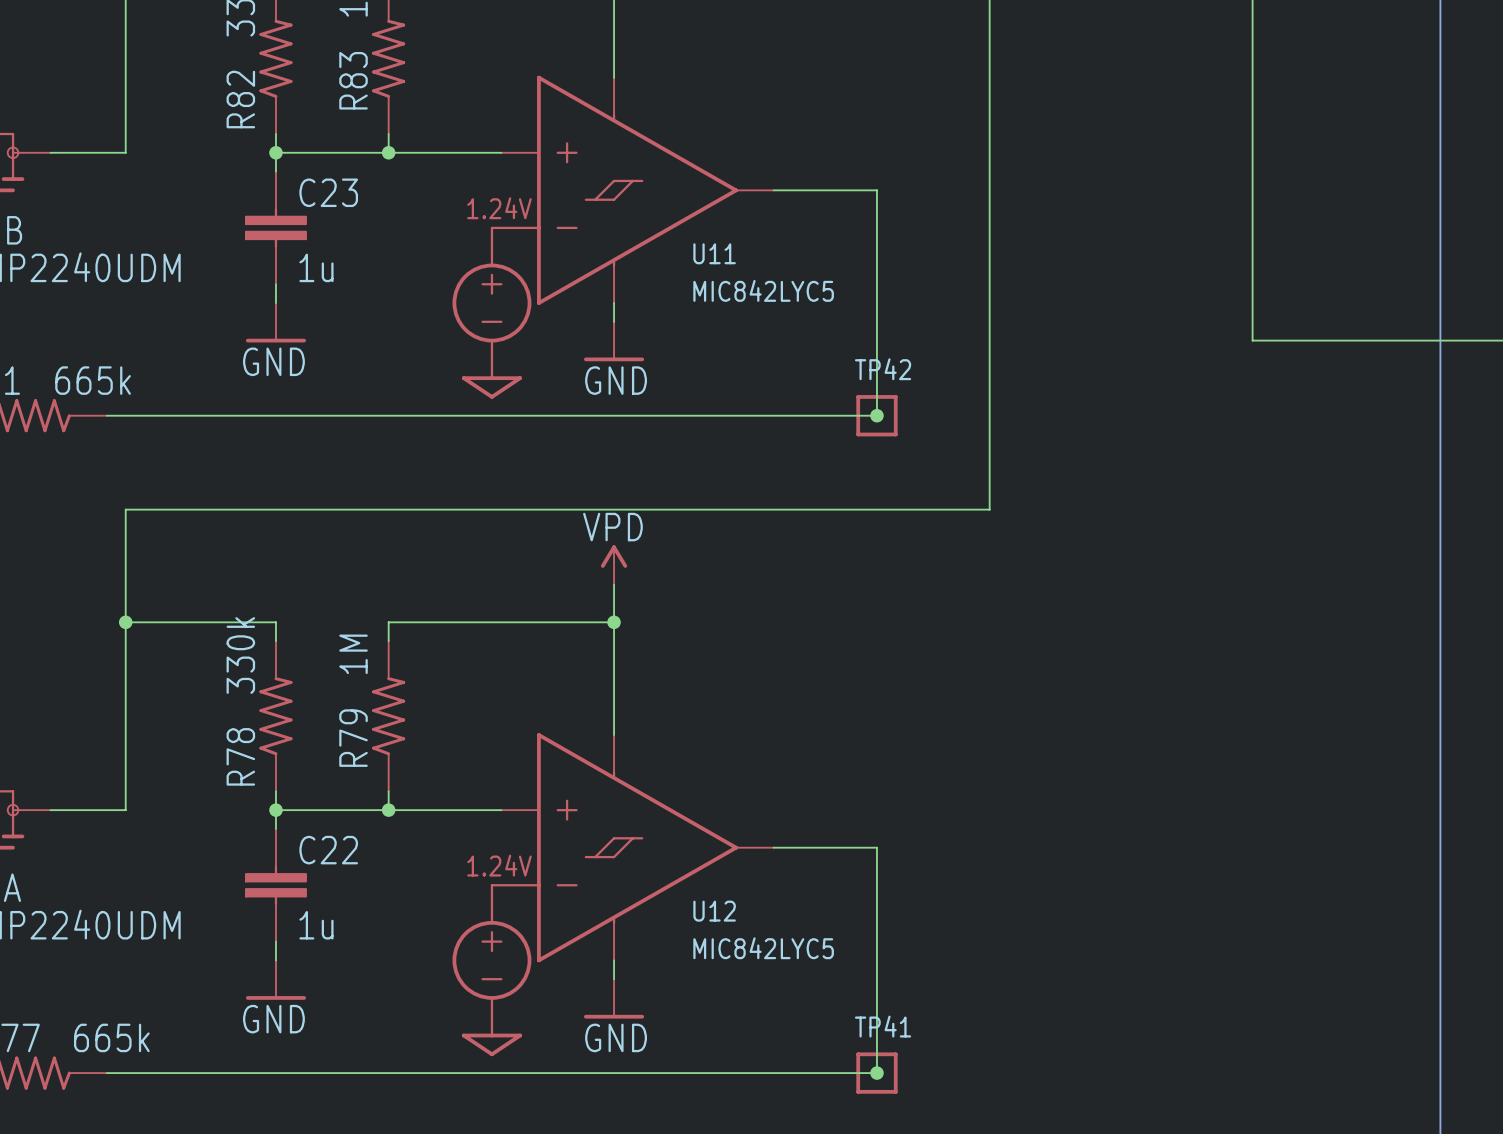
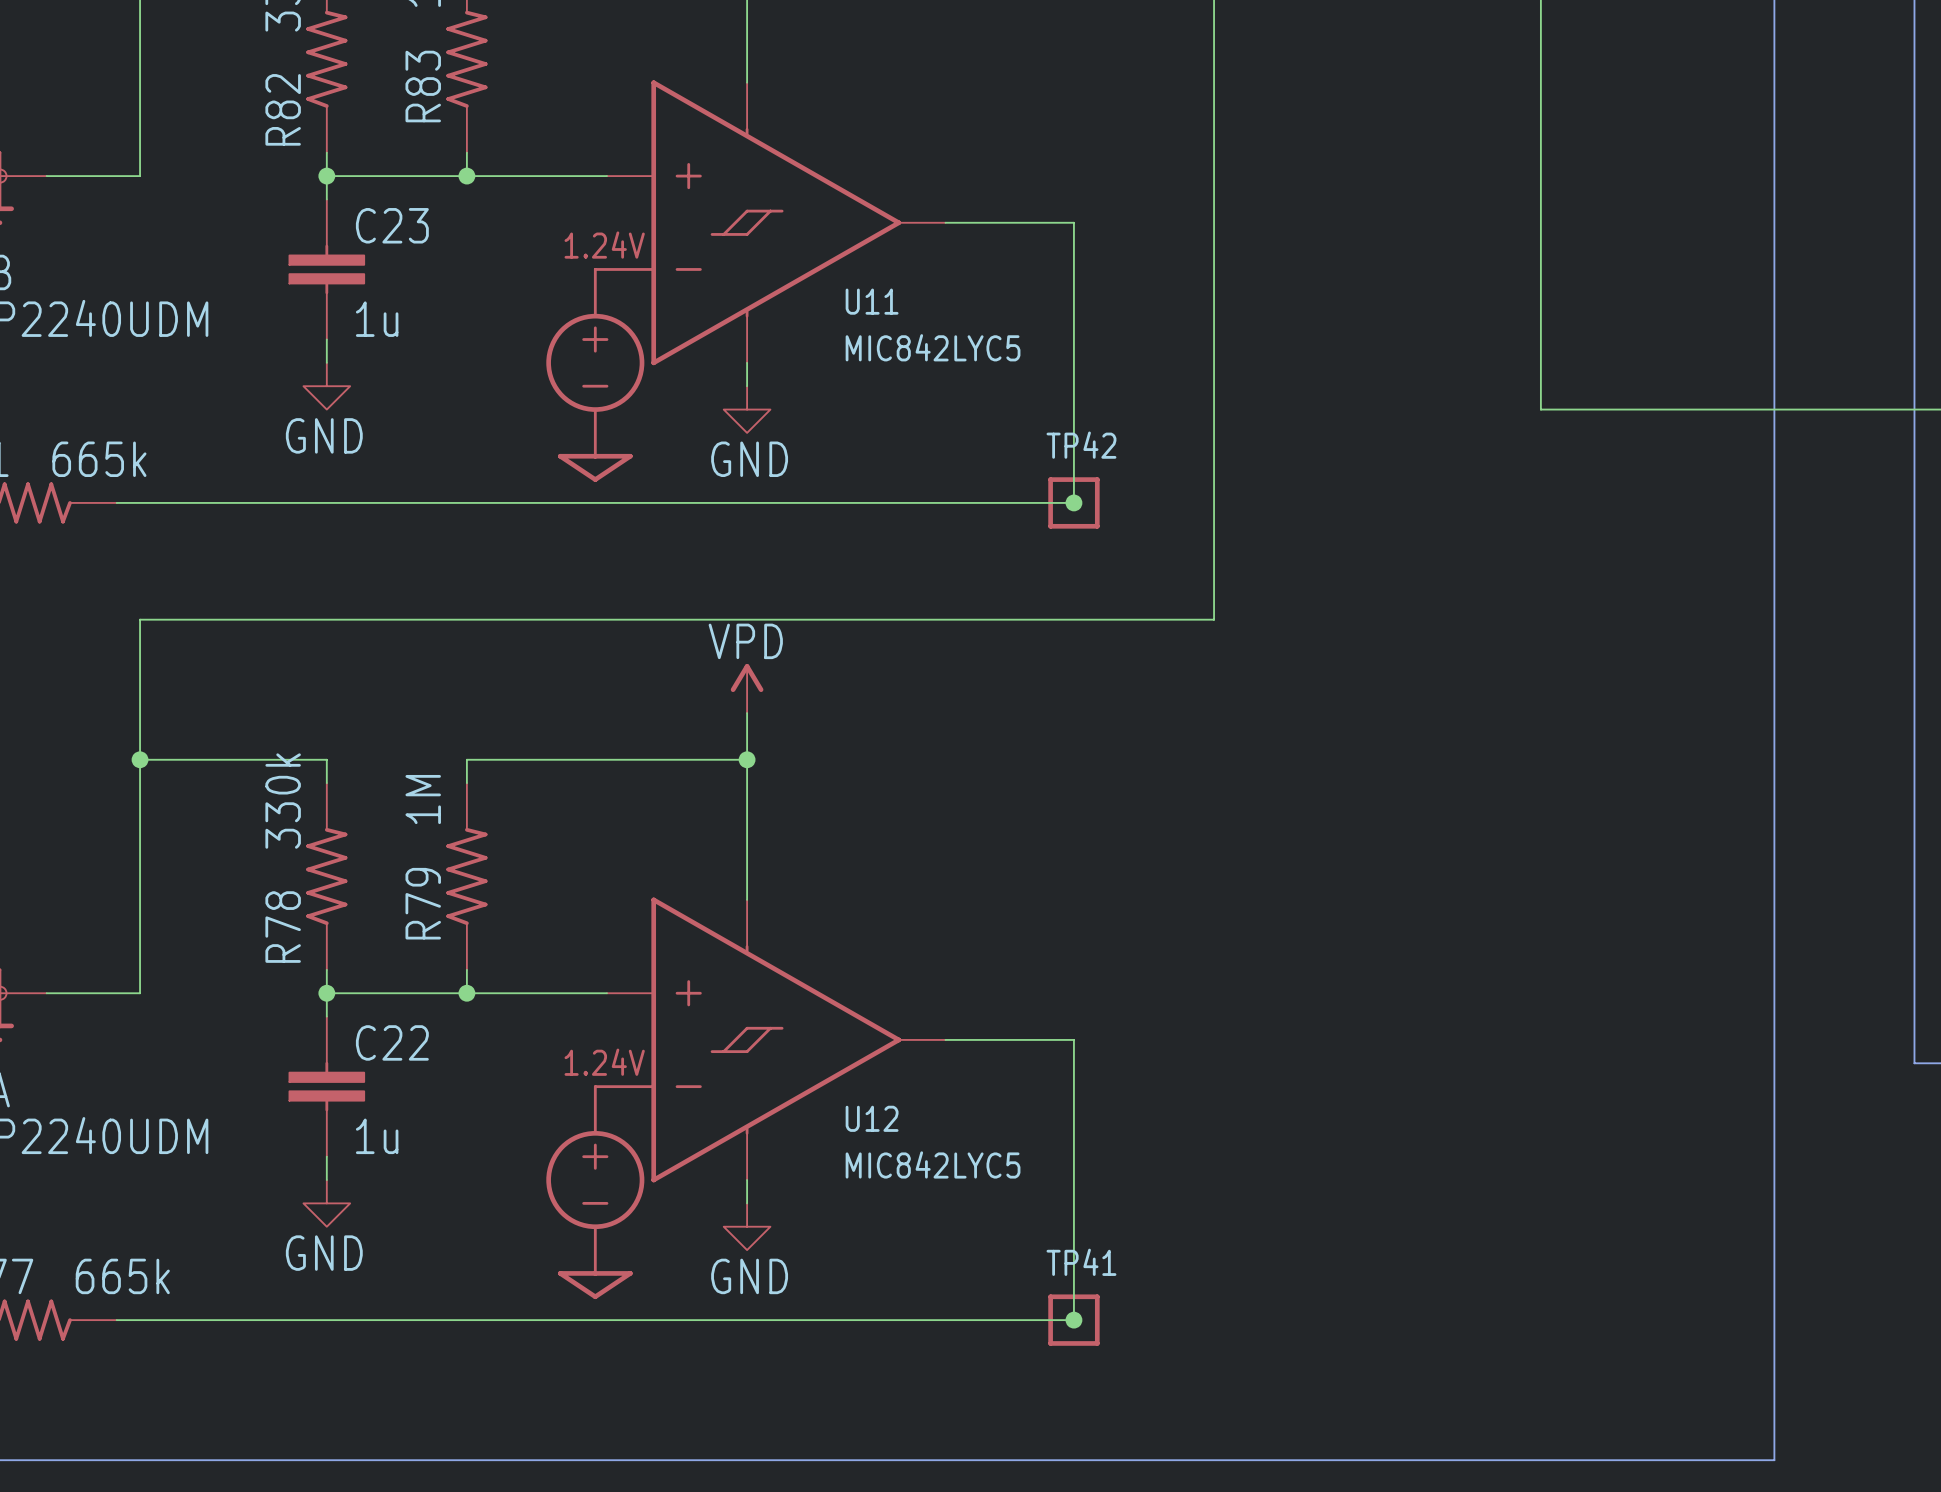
power symbol shape: [245, 303, 307, 343] -> [303, 362, 351, 410]
power symbol shape: [583, 321, 645, 362] -> [723, 386, 771, 433]
power symbol shape: [245, 960, 307, 1000] -> [303, 1180, 351, 1227]
power symbol shape: [583, 979, 645, 1019] -> [723, 1203, 771, 1251]

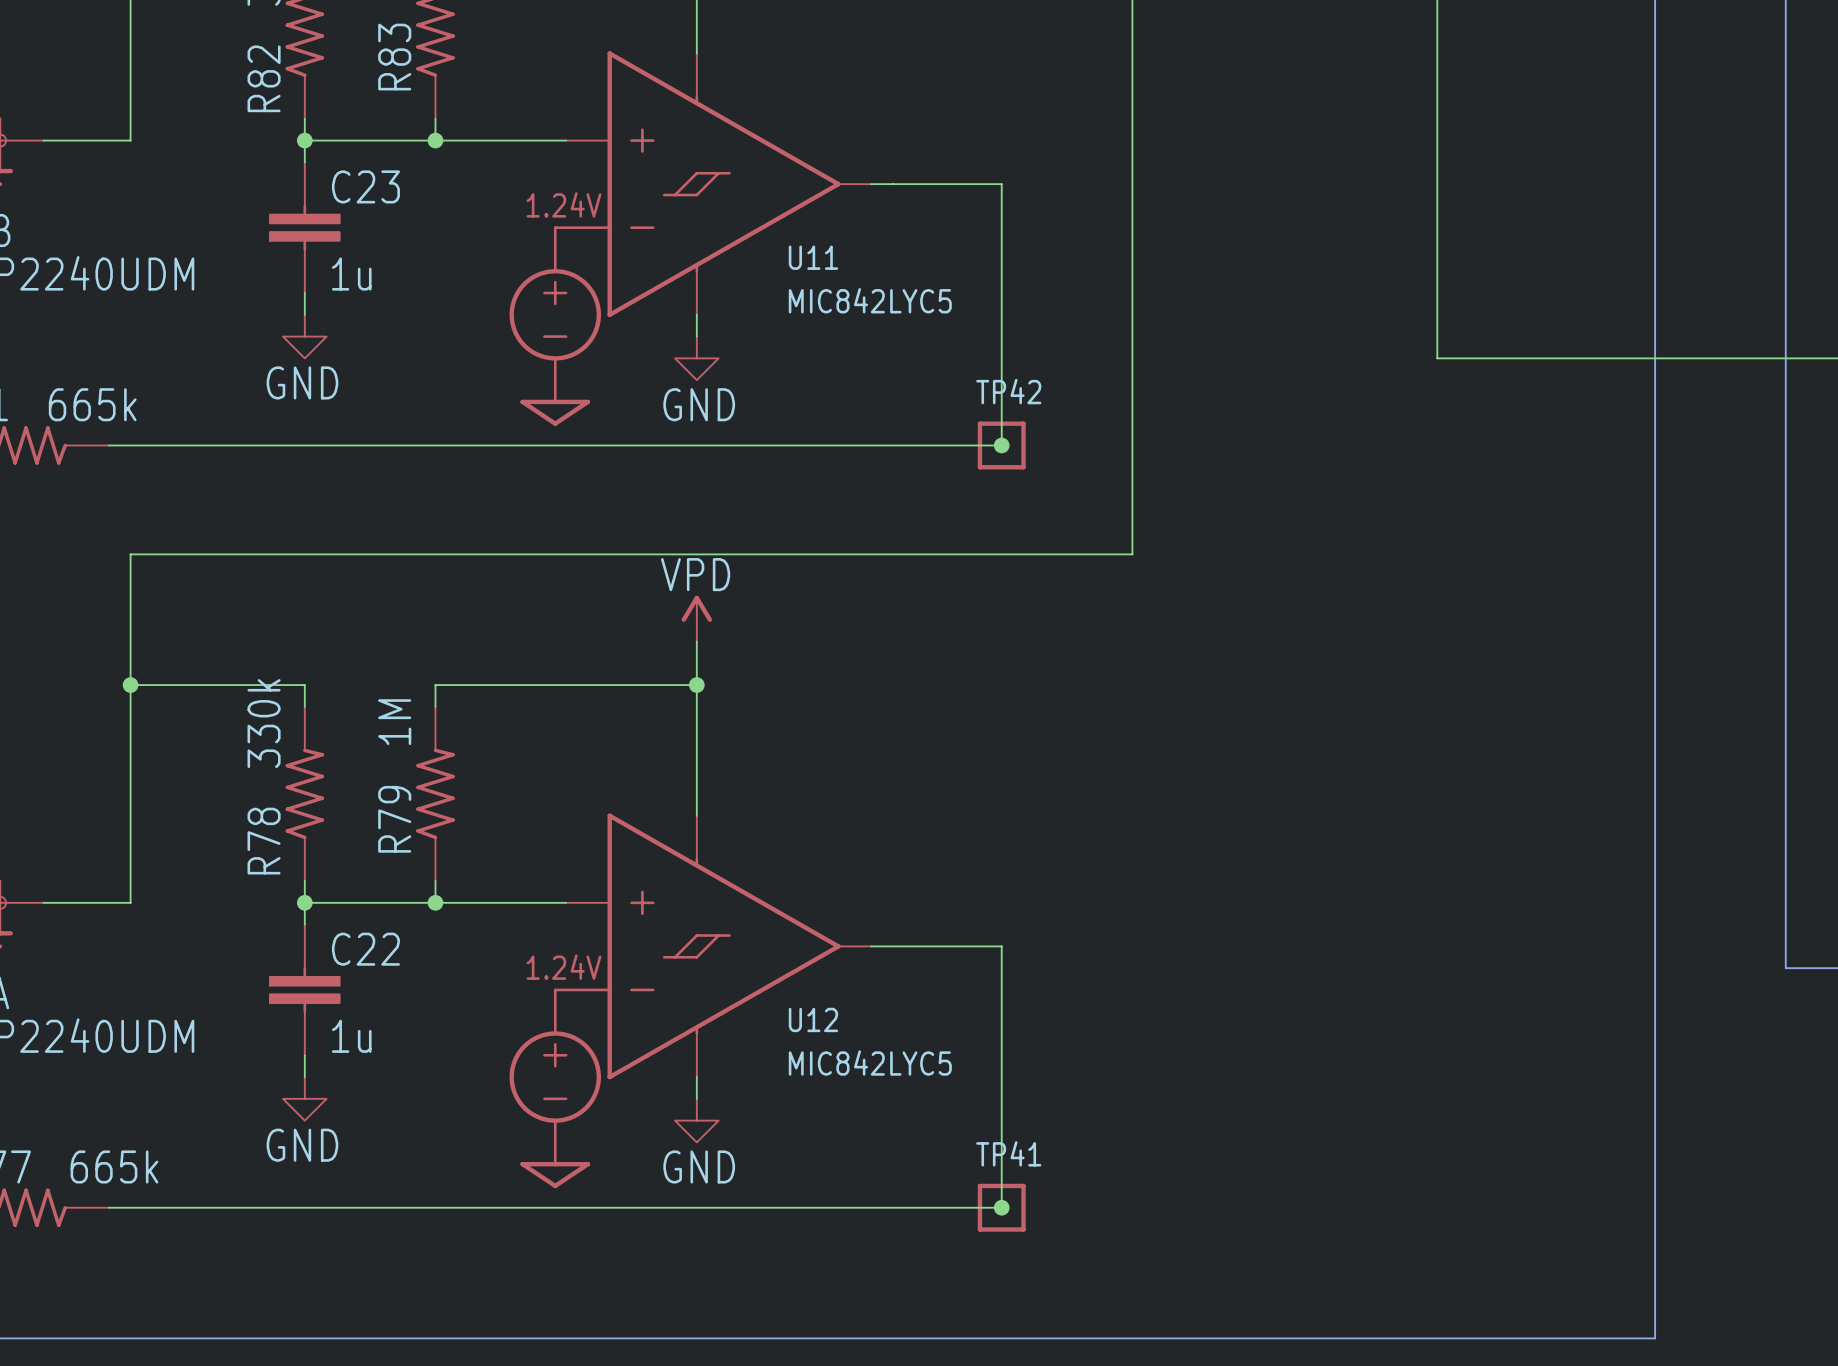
U11 symbol: [546, 80, 946, 482] -> [509, 51, 872, 426]
U12 symbol: [546, 897, 946, 1300] -> [509, 813, 872, 1189]

